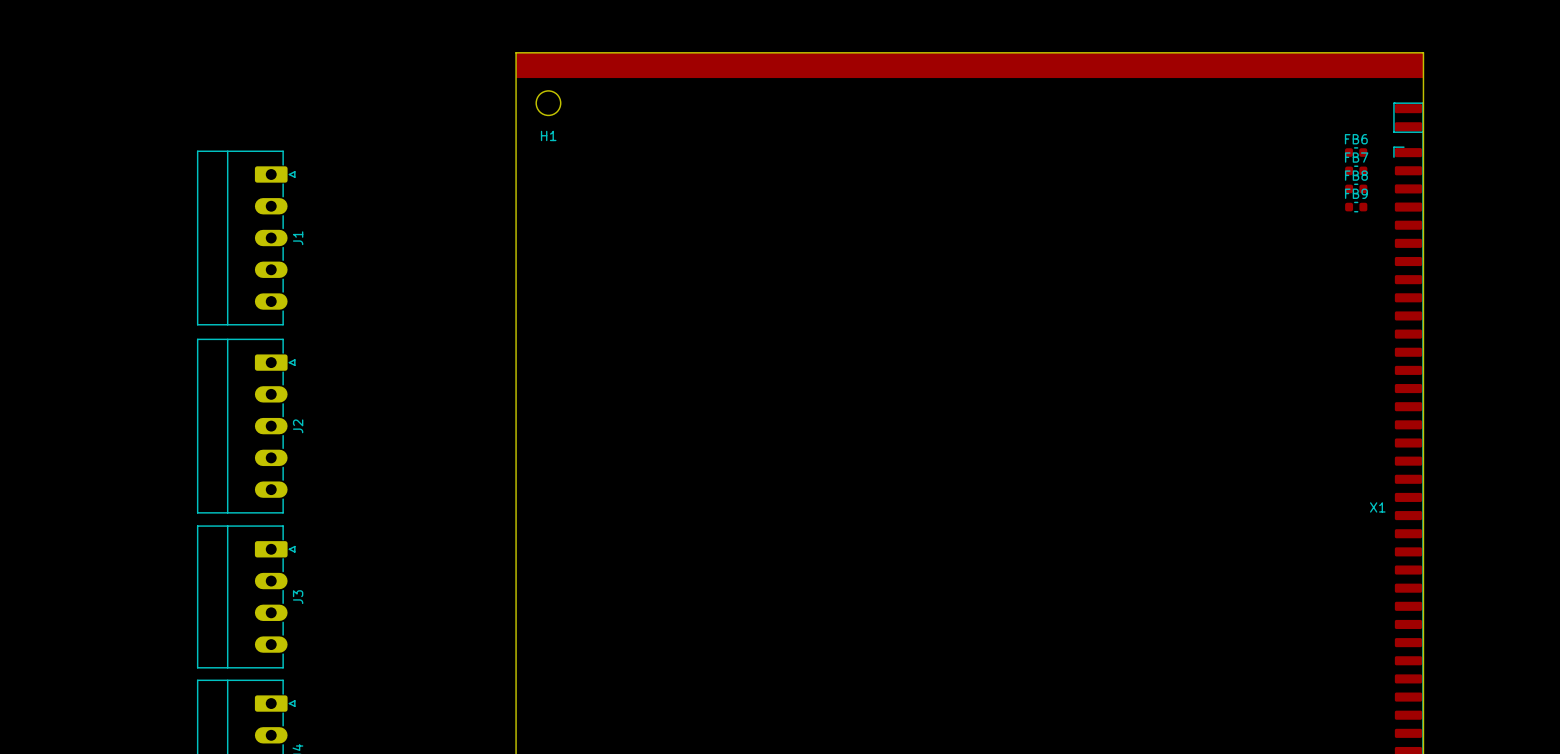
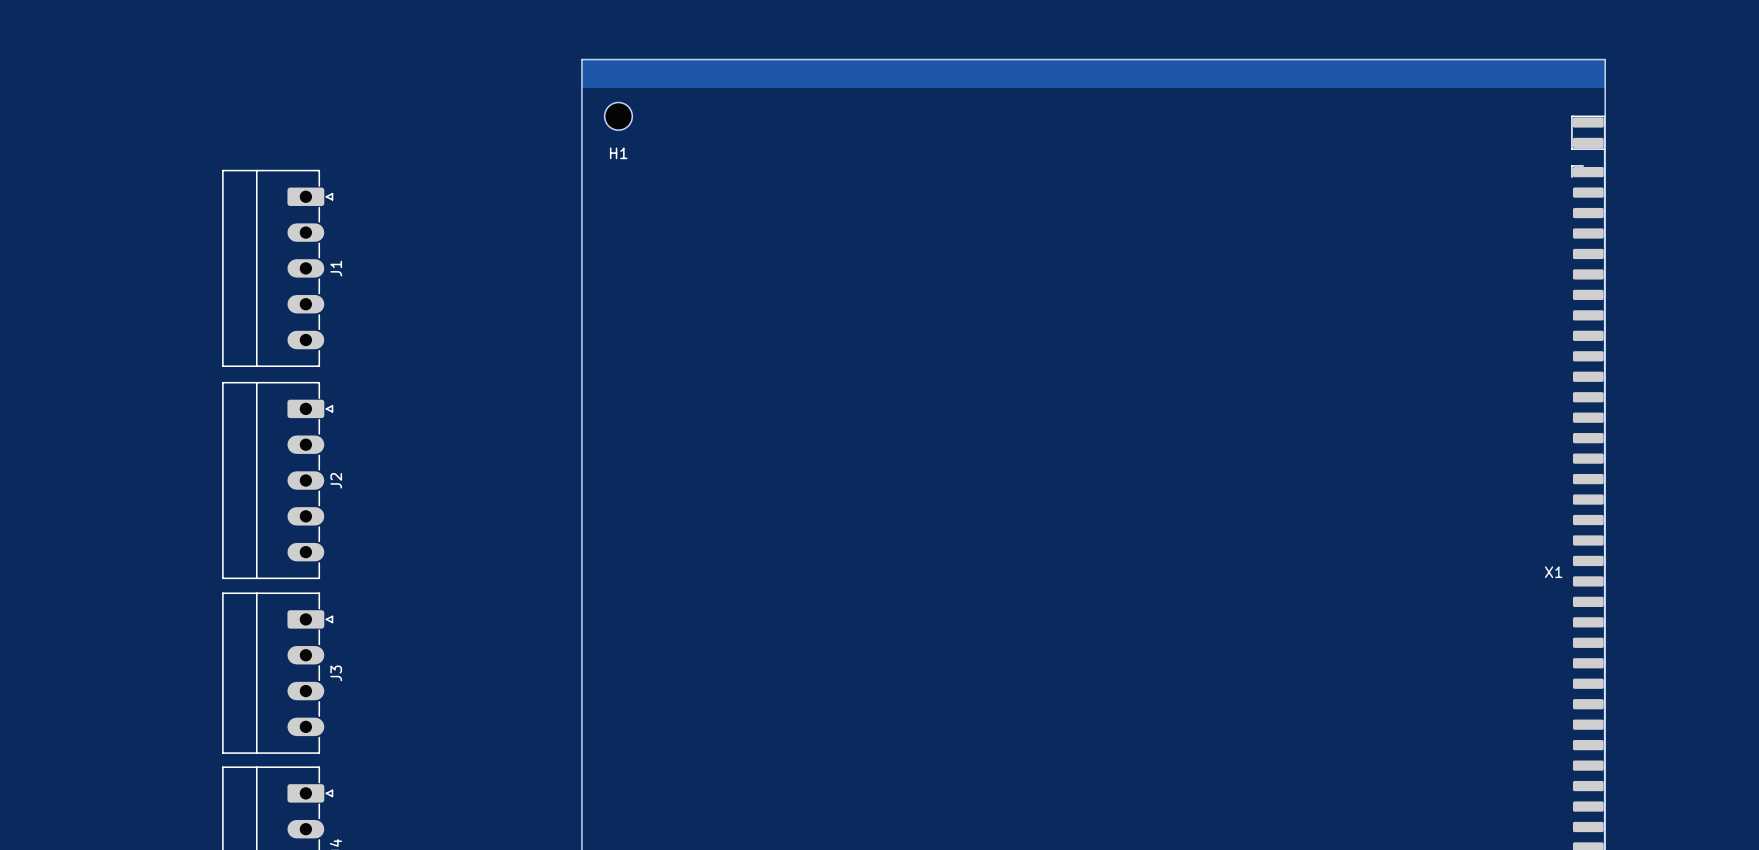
FB6: (1356, 152) -> none
FB7: (1356, 170) -> none
FB8: (1356, 188) -> none
FB9: (1356, 207) -> none

